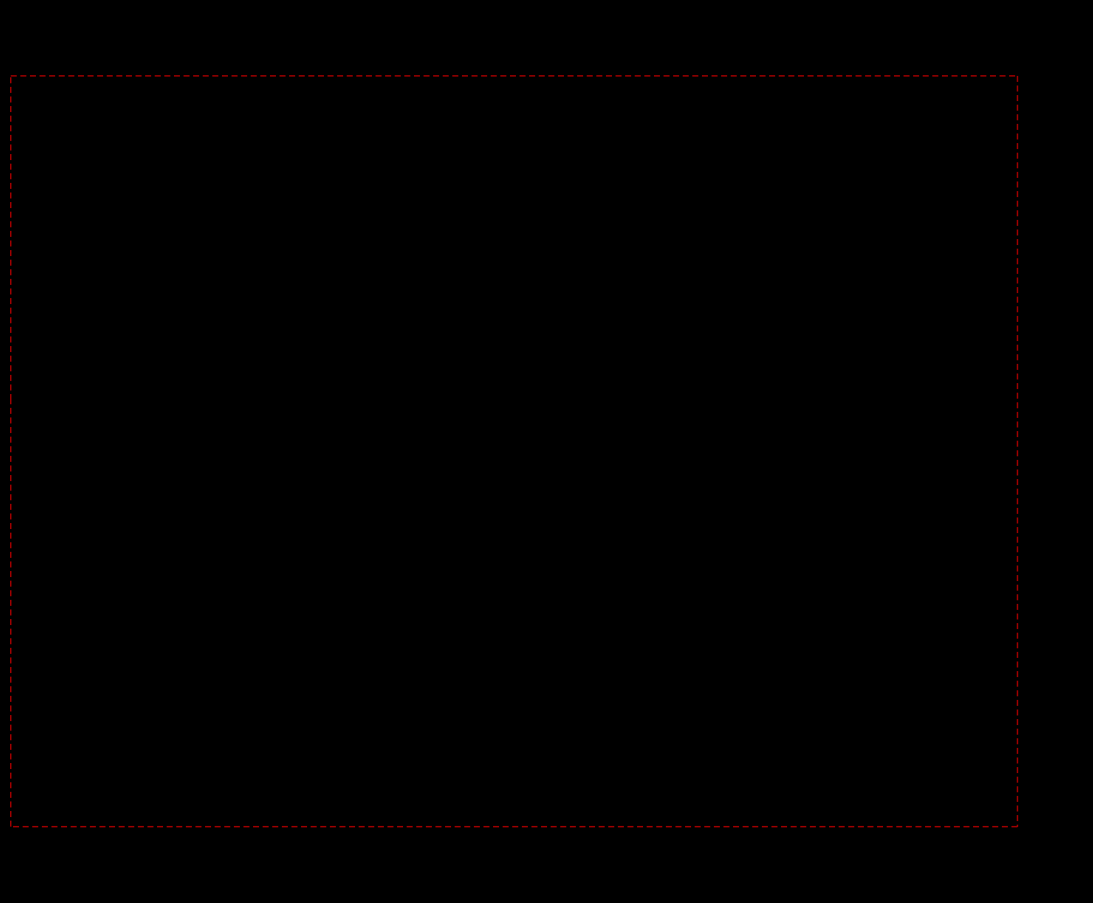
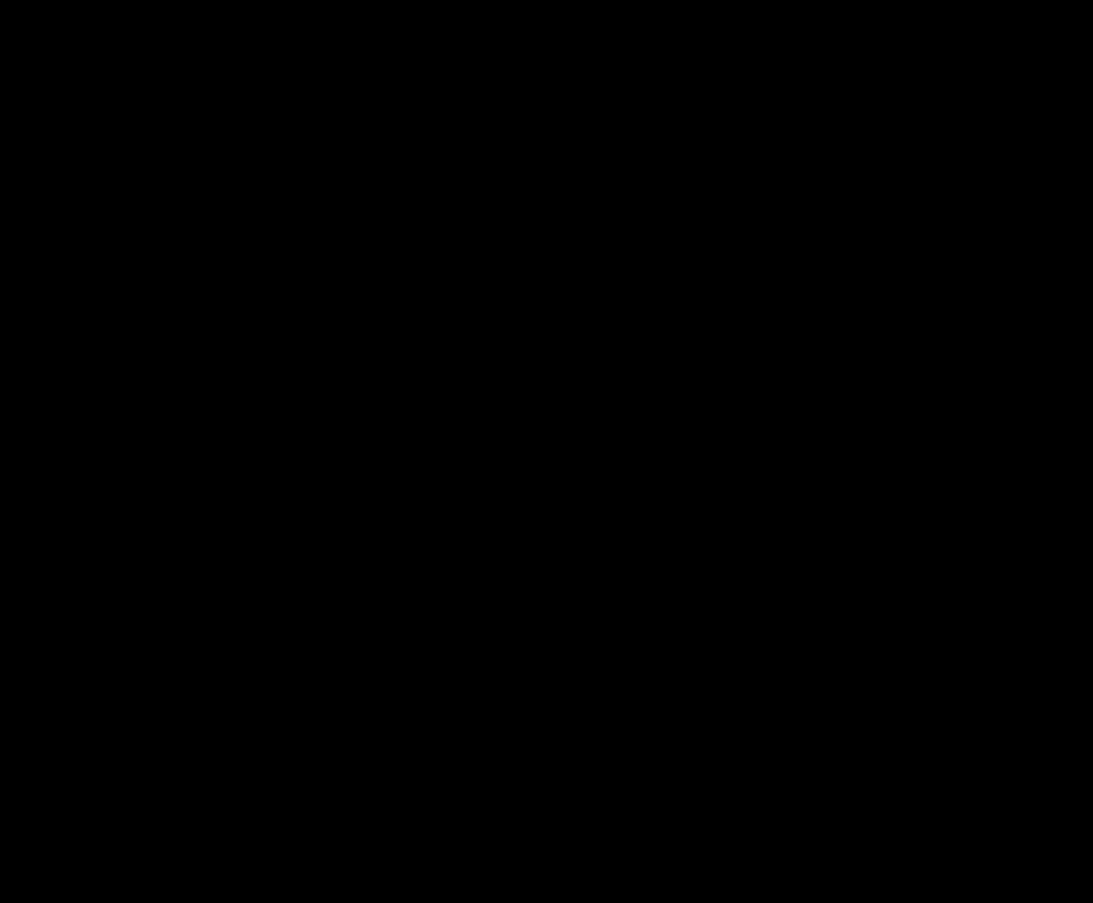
zone outline: (10, 75) (10, 826) (1017, 826) (1017, 75) (10, 75) -> none

